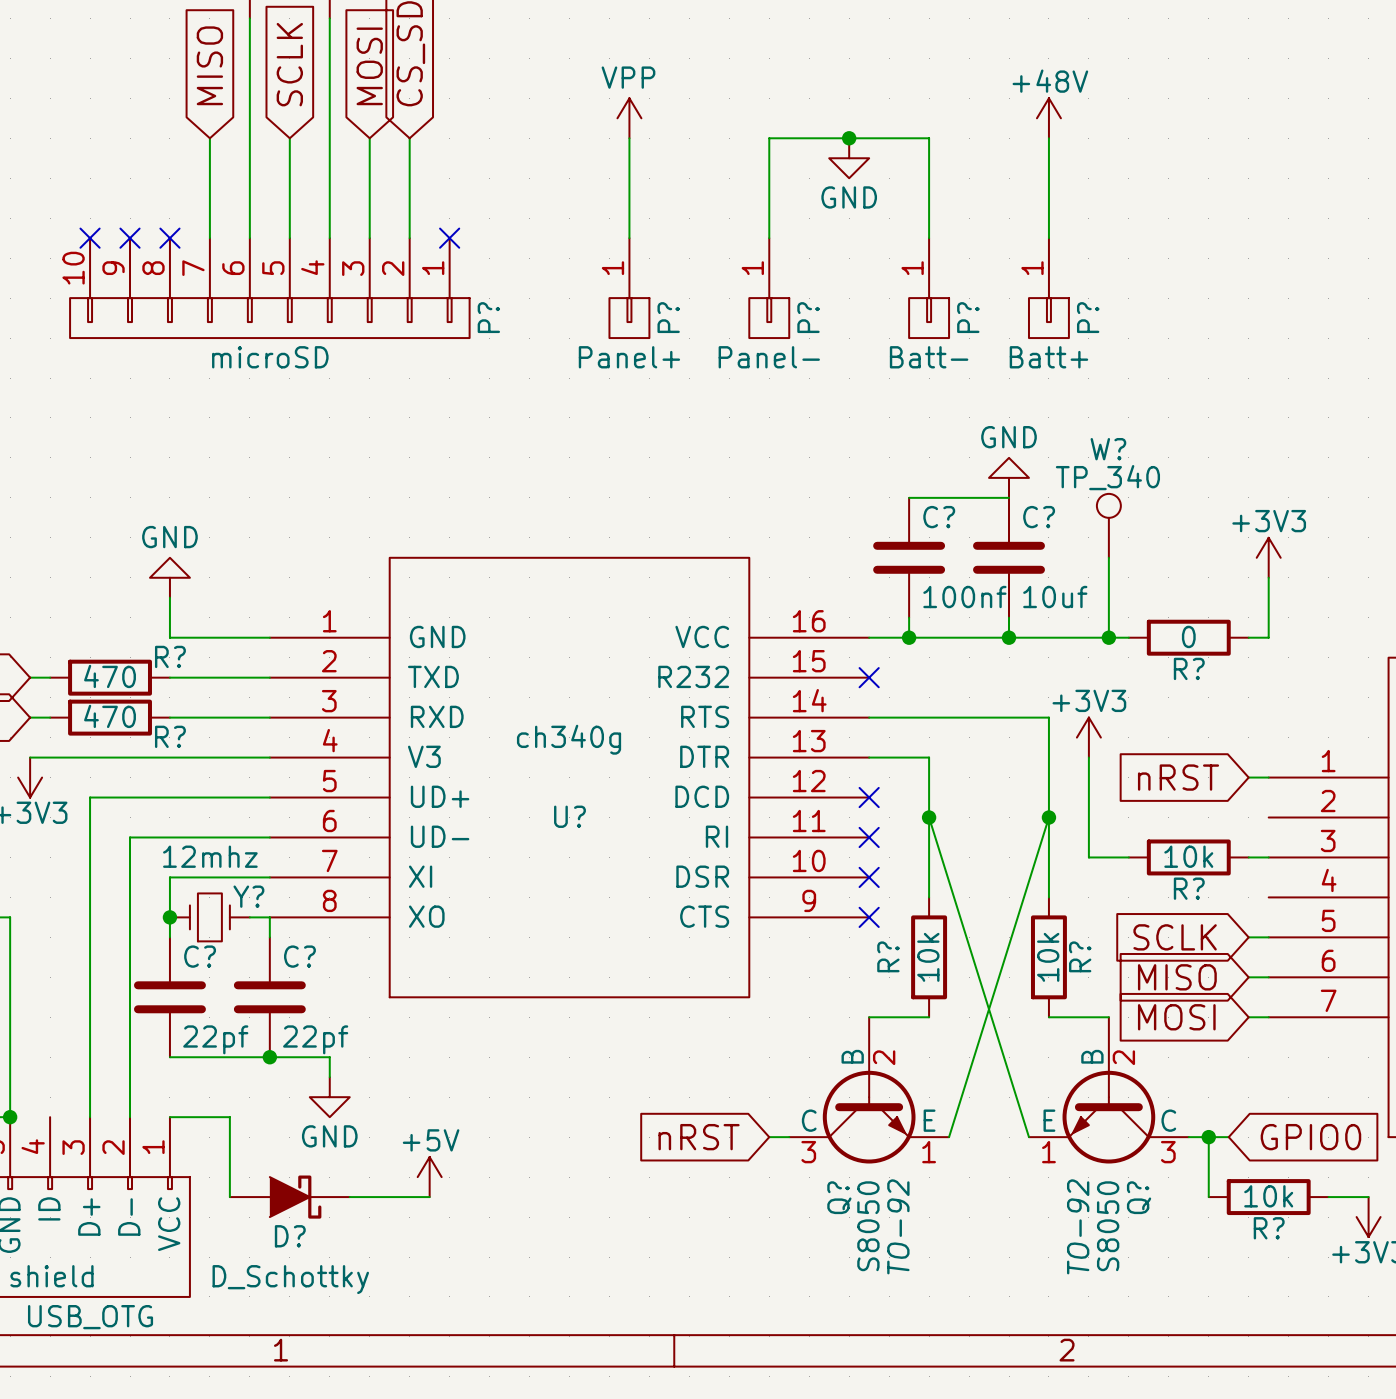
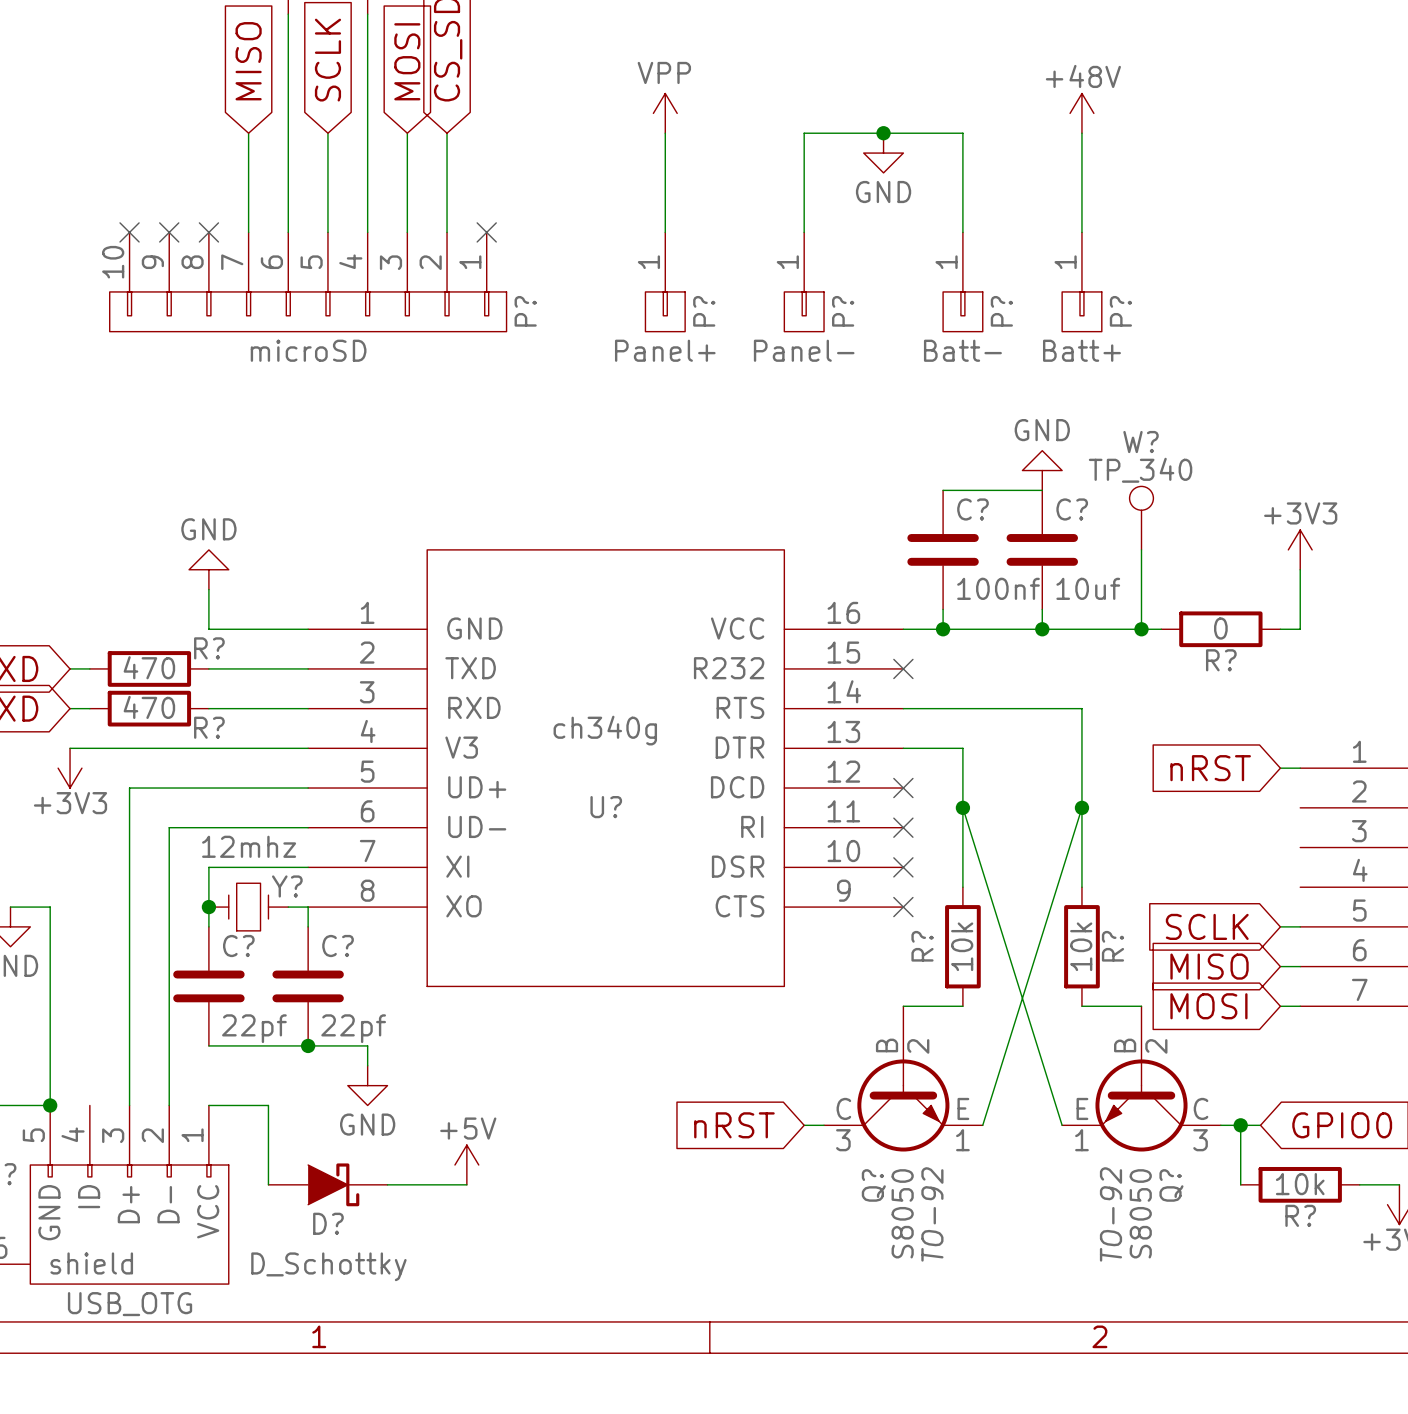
power symbol: +3V3 (1088, 737) -> none
wire: (1088, 757) (1088, 857) (1128, 857) -> none
R?: 10k (1188, 857) -> none
wire: (1248, 857) (1268, 857) -> none

